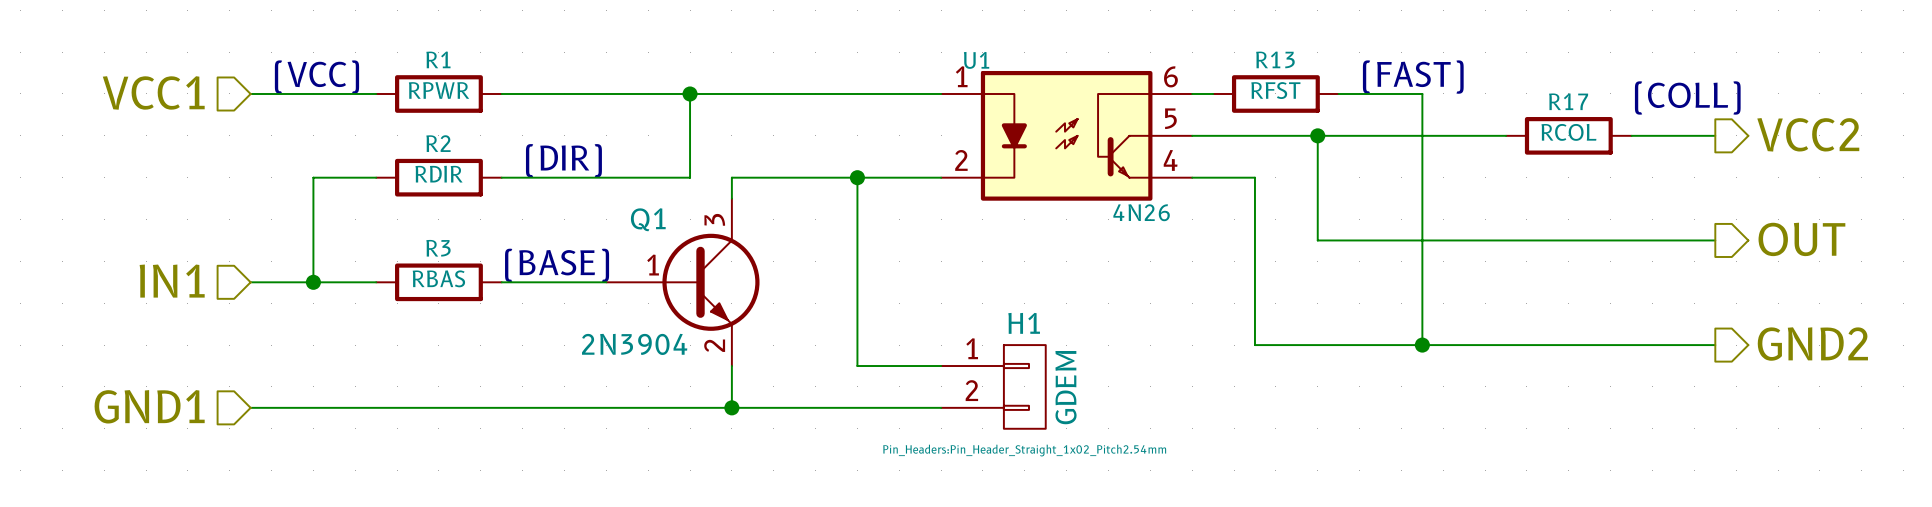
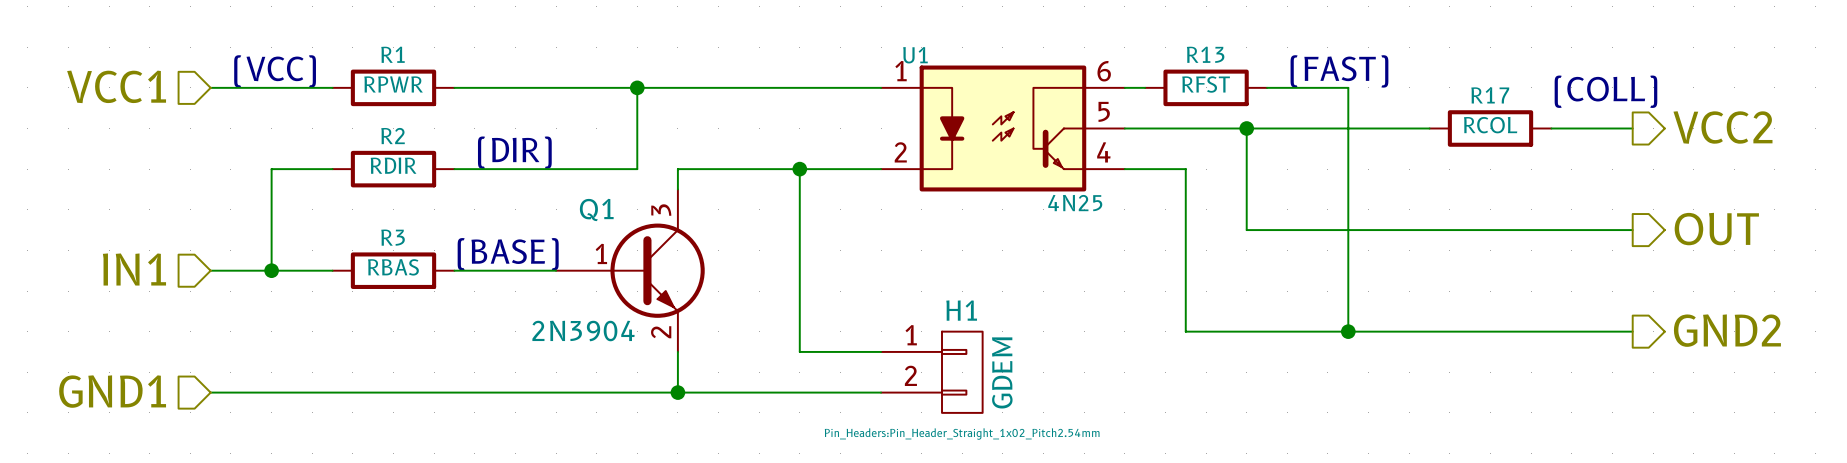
U1 value: 4N26 (1141, 212) -> 4N25 (1075, 203)

